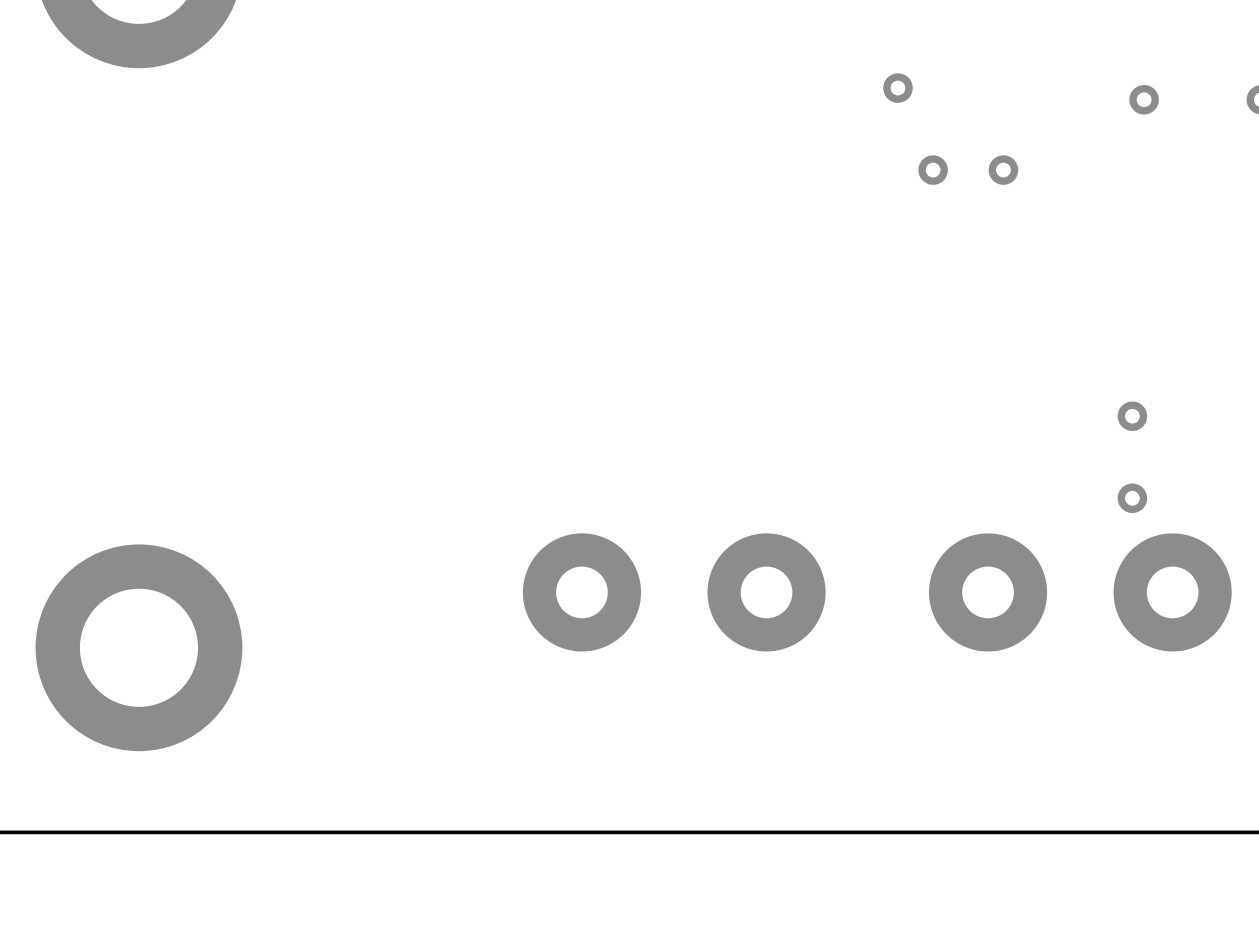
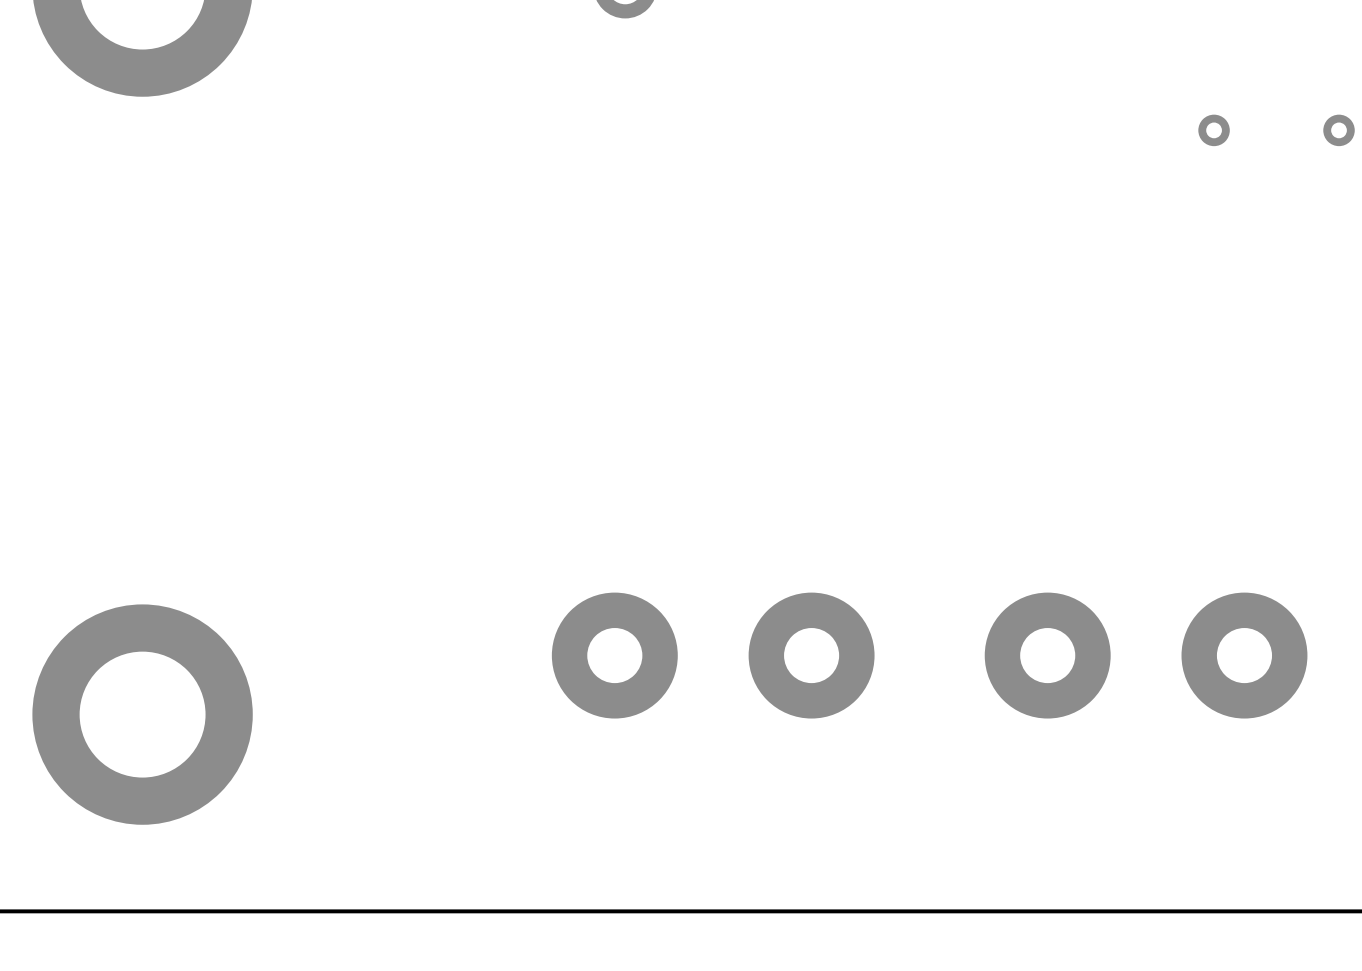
via: (897, 88) -> none
via: (933, 170) -> none
via: (1003, 170) -> none
via: (1132, 416) -> none
via: (1132, 498) -> none

